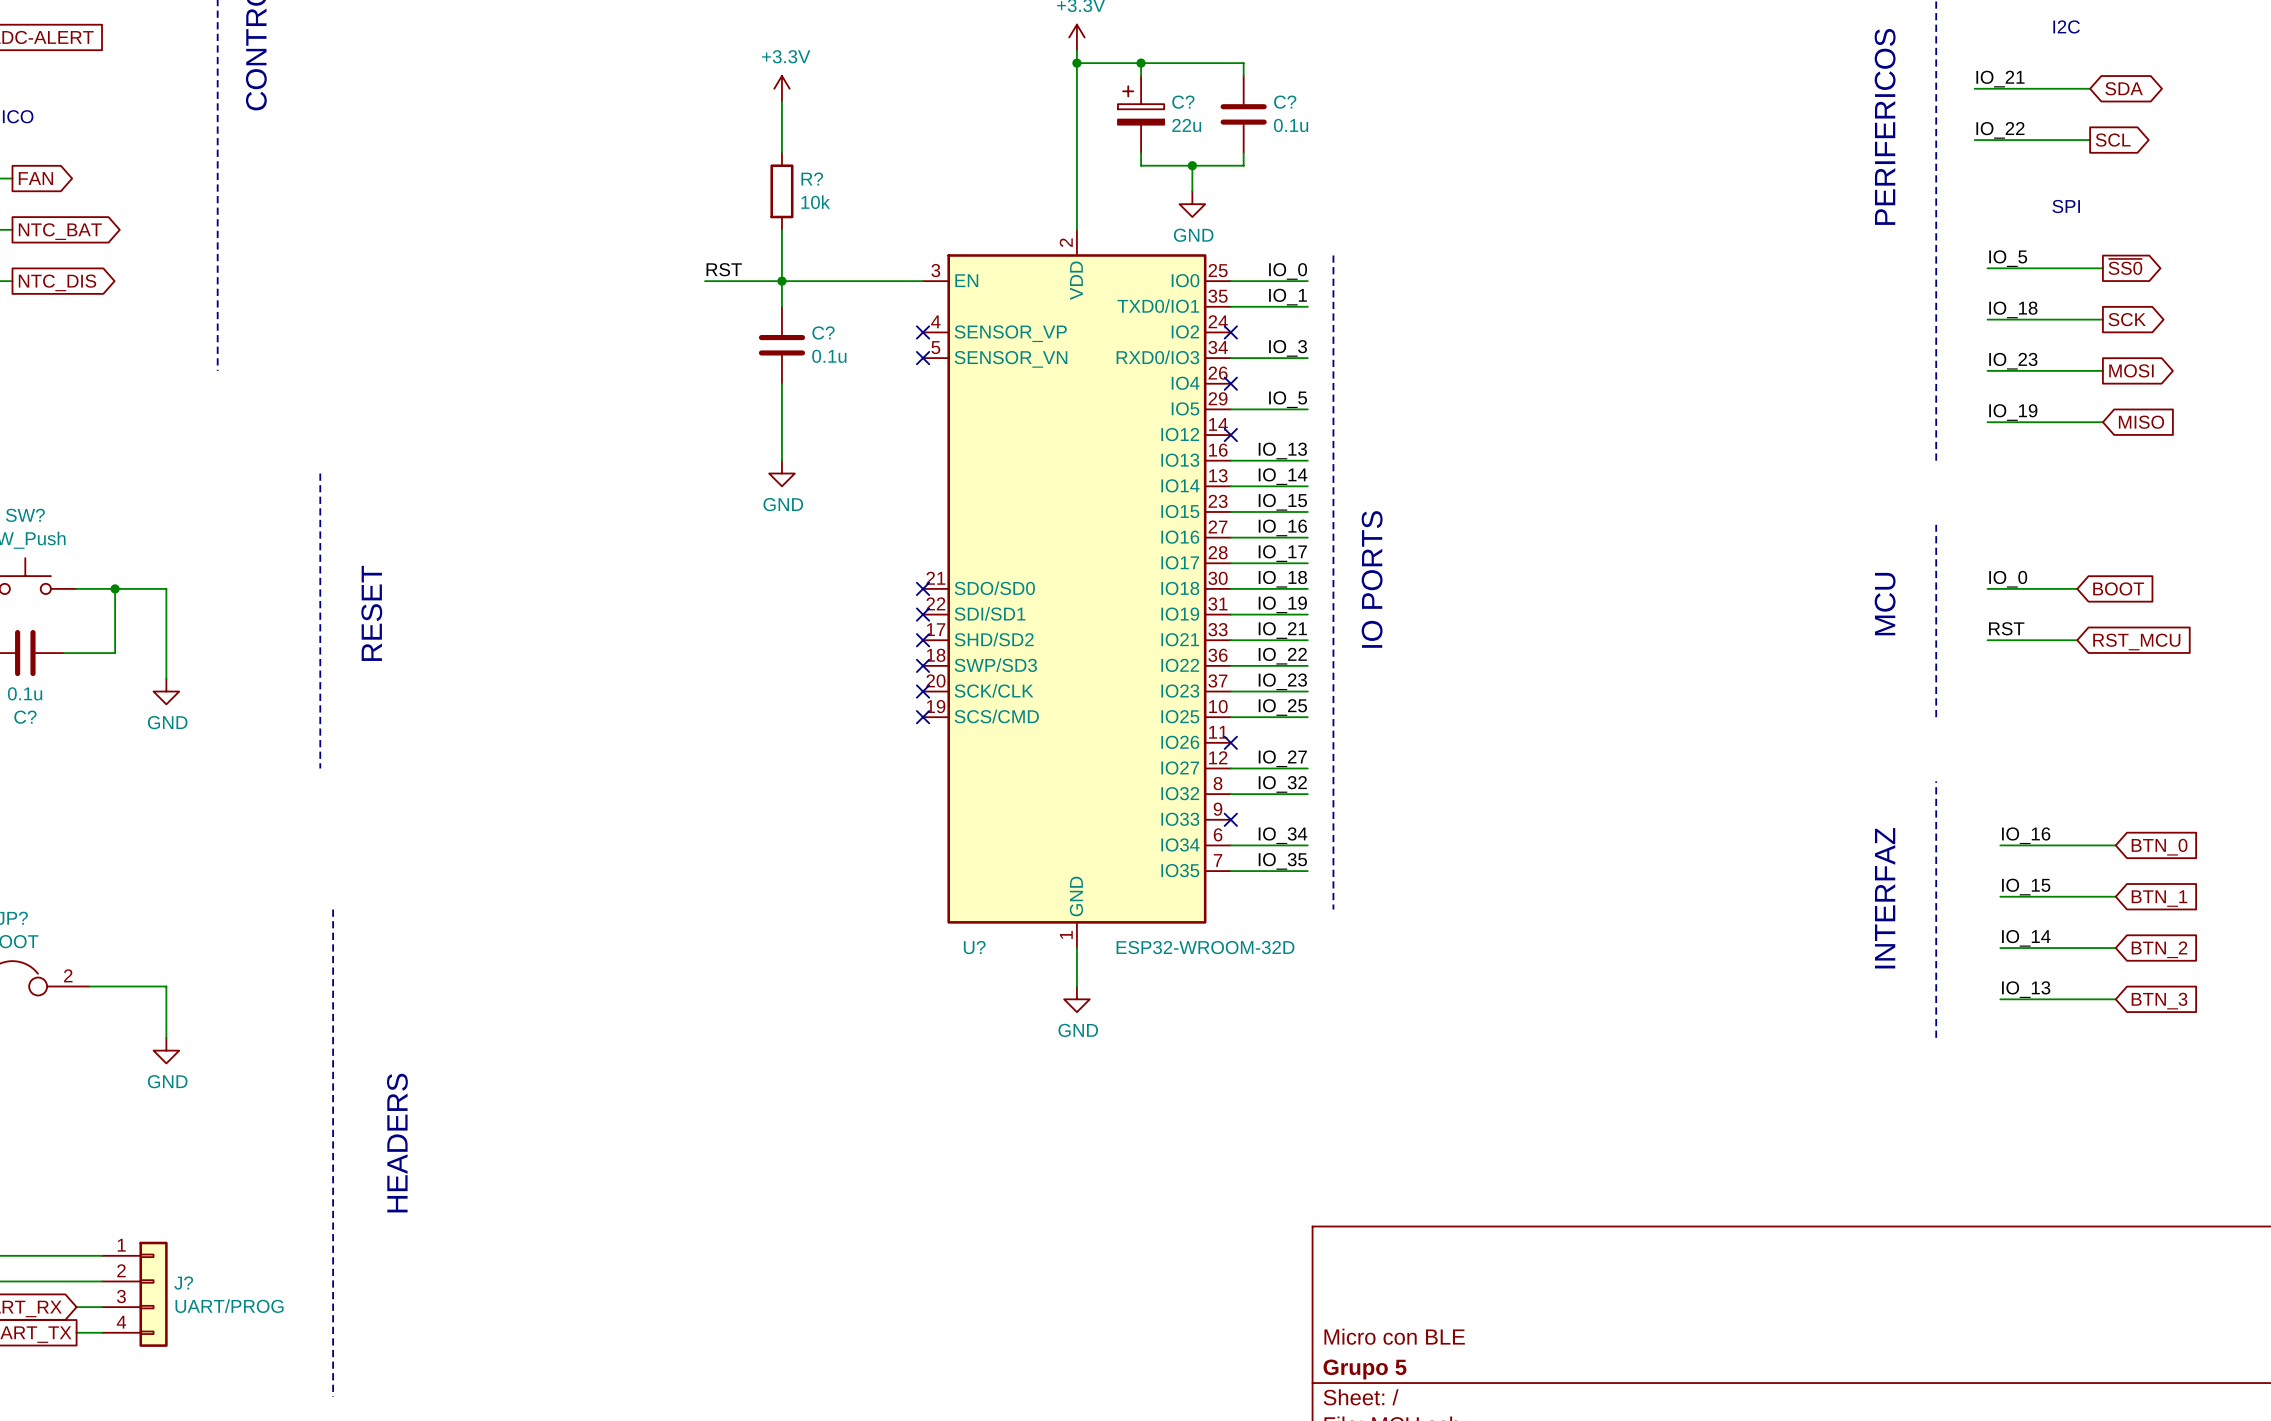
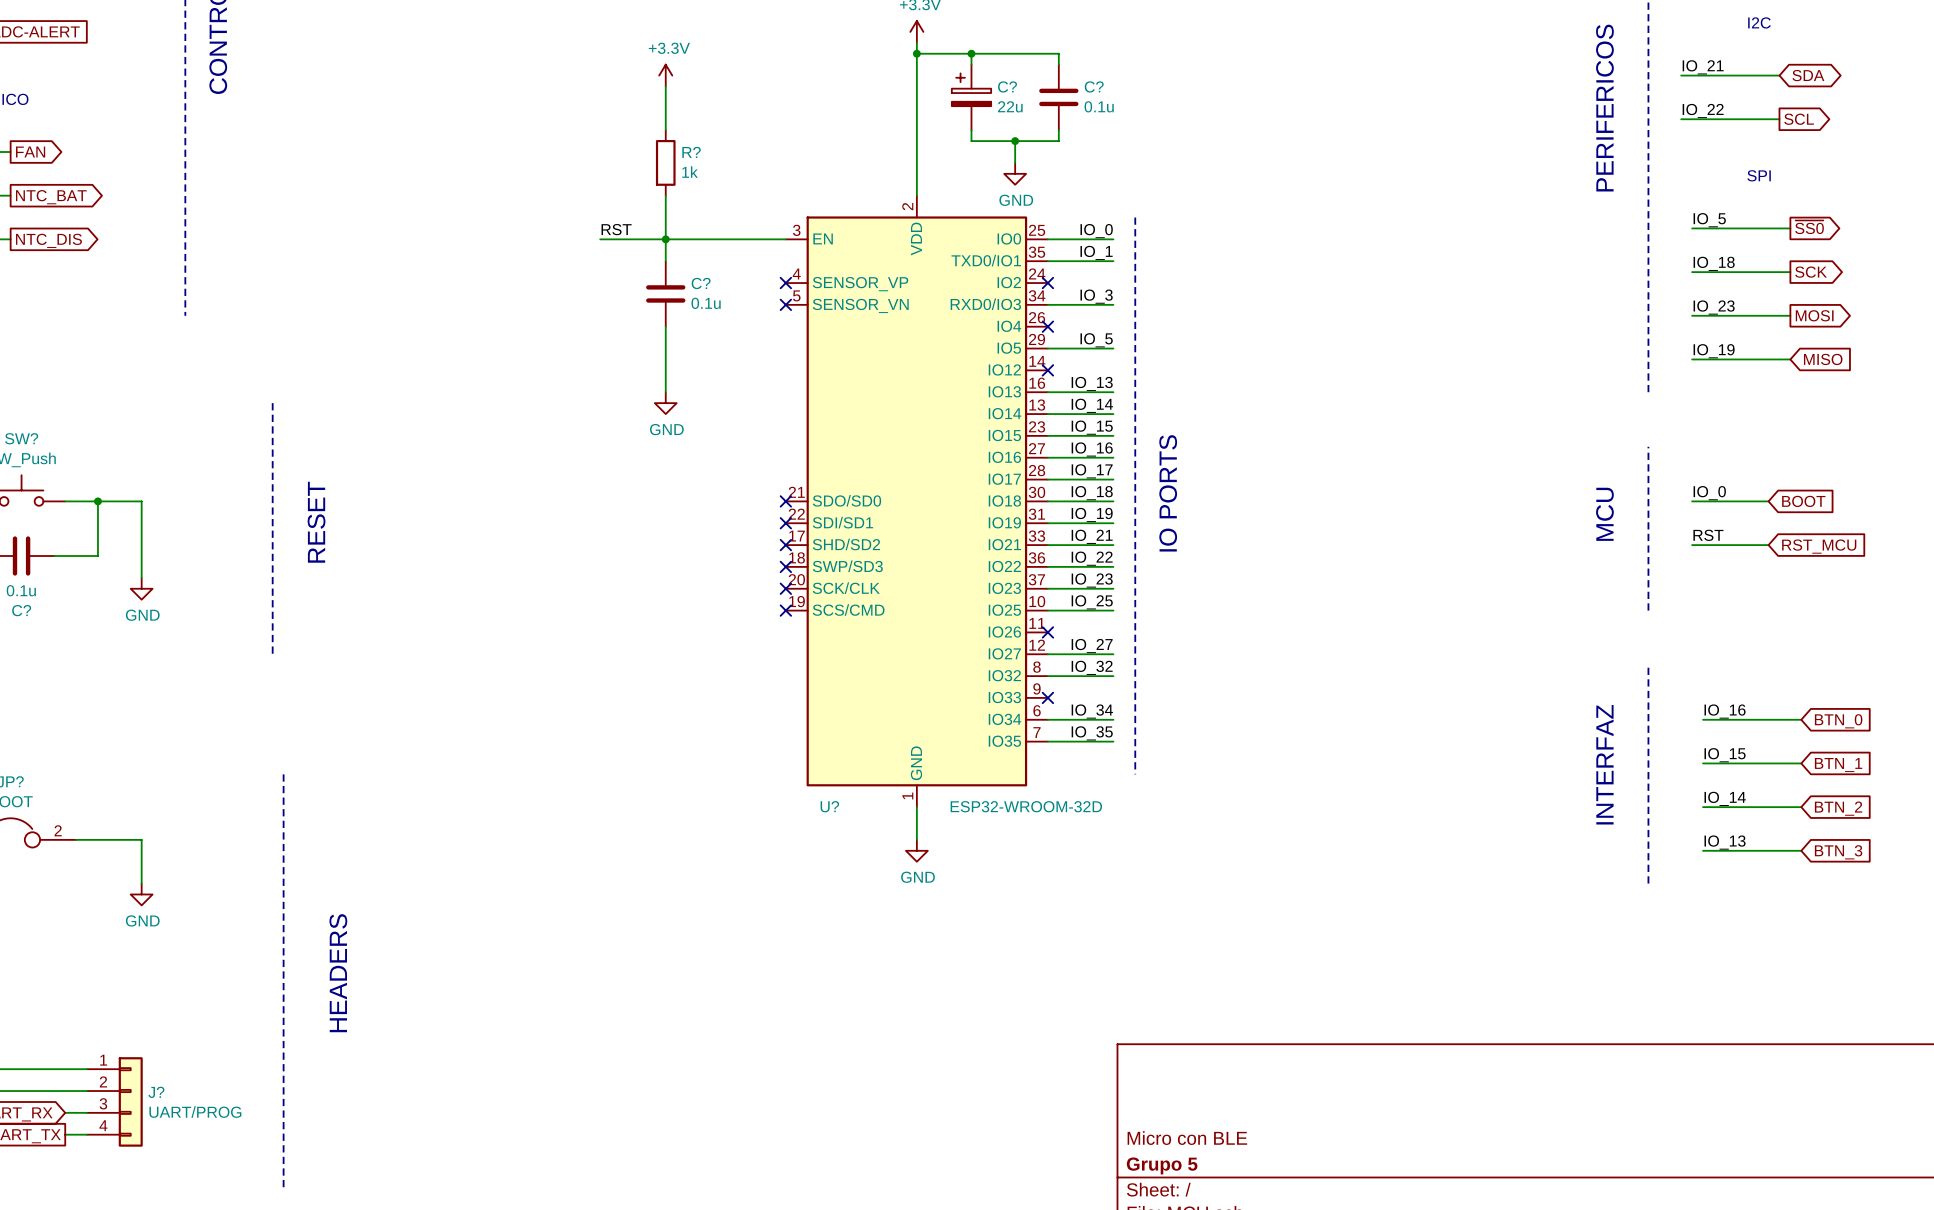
R? value: 10k (815, 202) -> 1k (690, 172)

